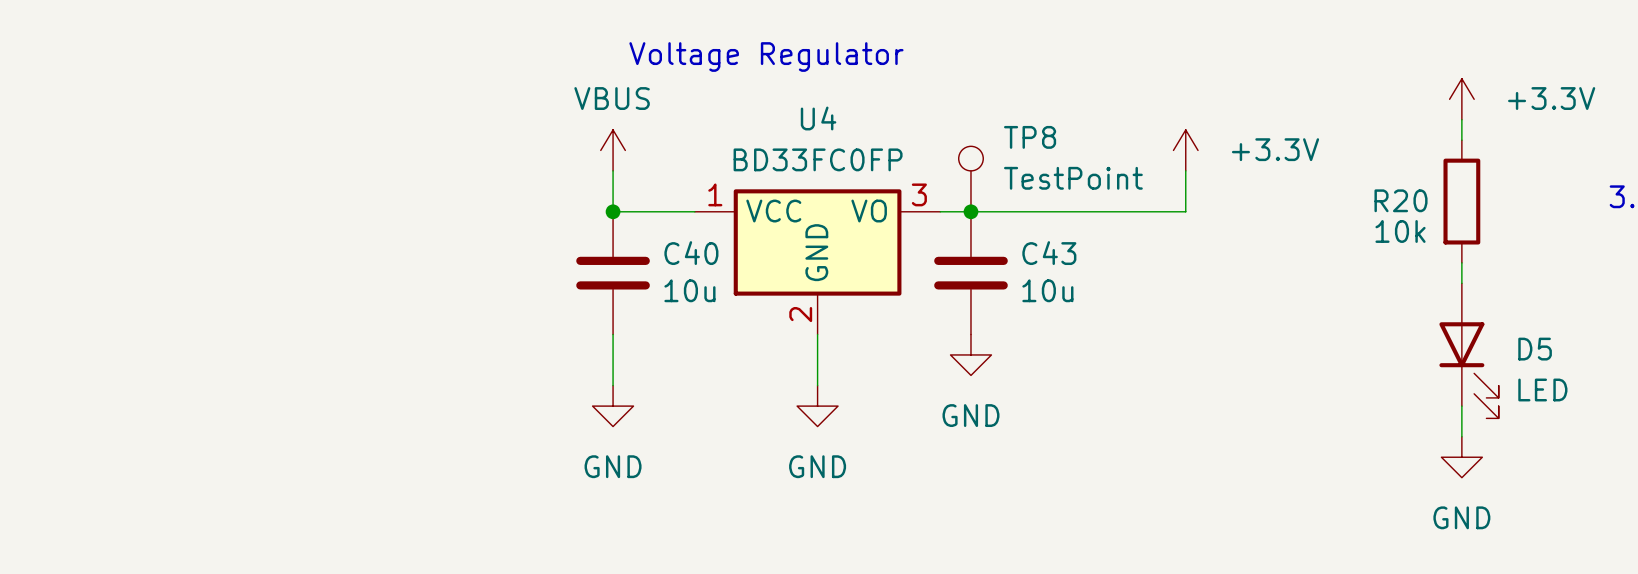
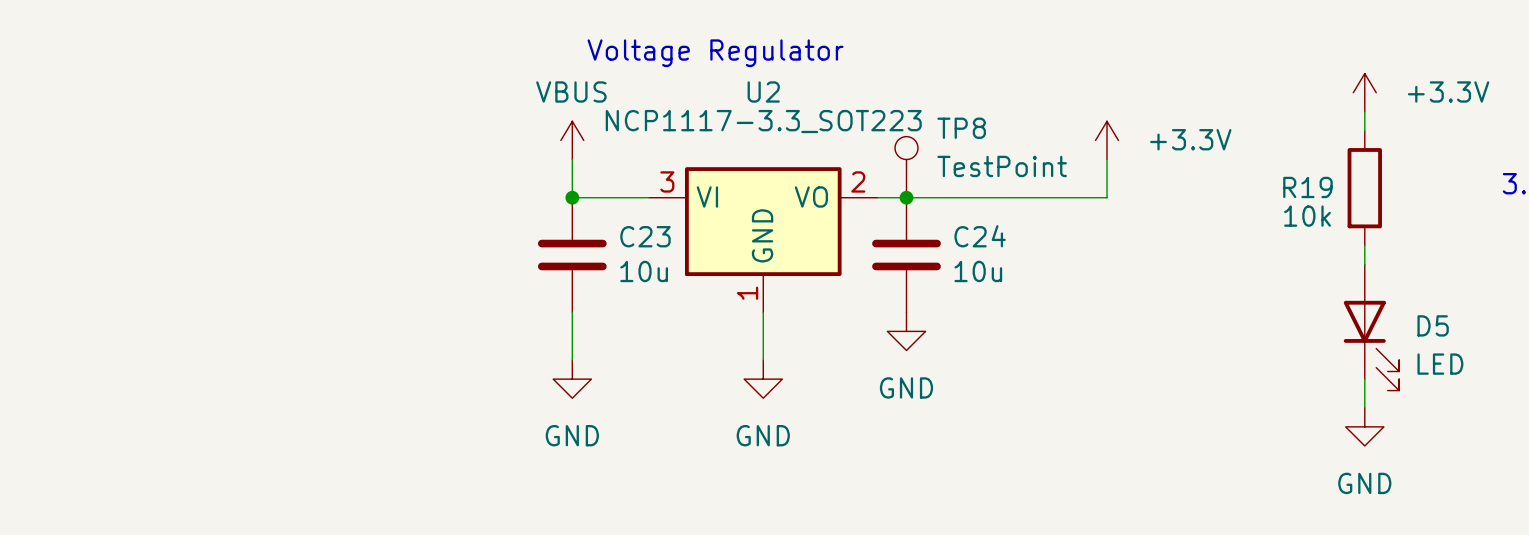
R20 name: R20 (1401, 200) -> R19 (1307, 187)
C40 name: C40 (691, 253) -> C23 (645, 236)
C43 name: C43 (1049, 253) -> C24 (980, 236)
U2: none -> NCP1117-3.3_SOT223 (763, 239)
U4: BD33FC0FP (817, 261) -> none

